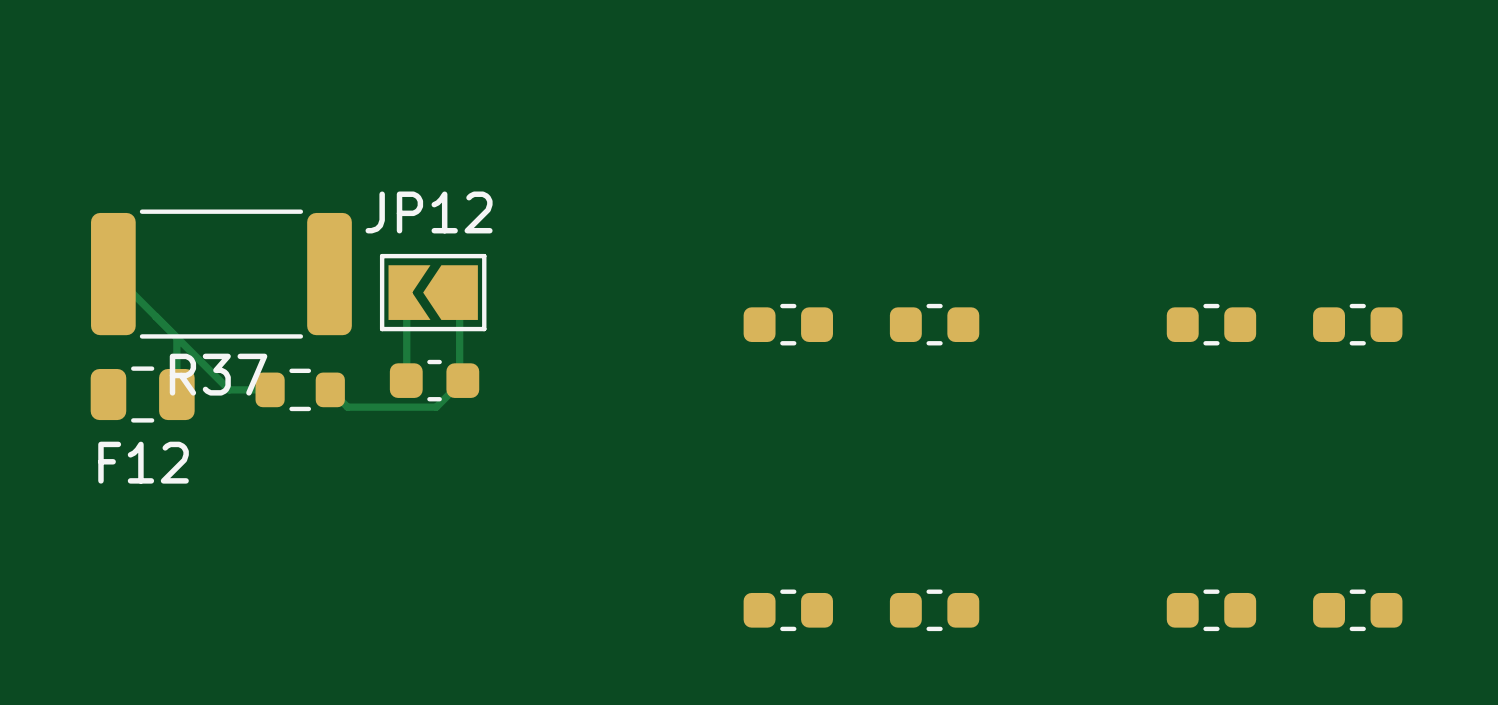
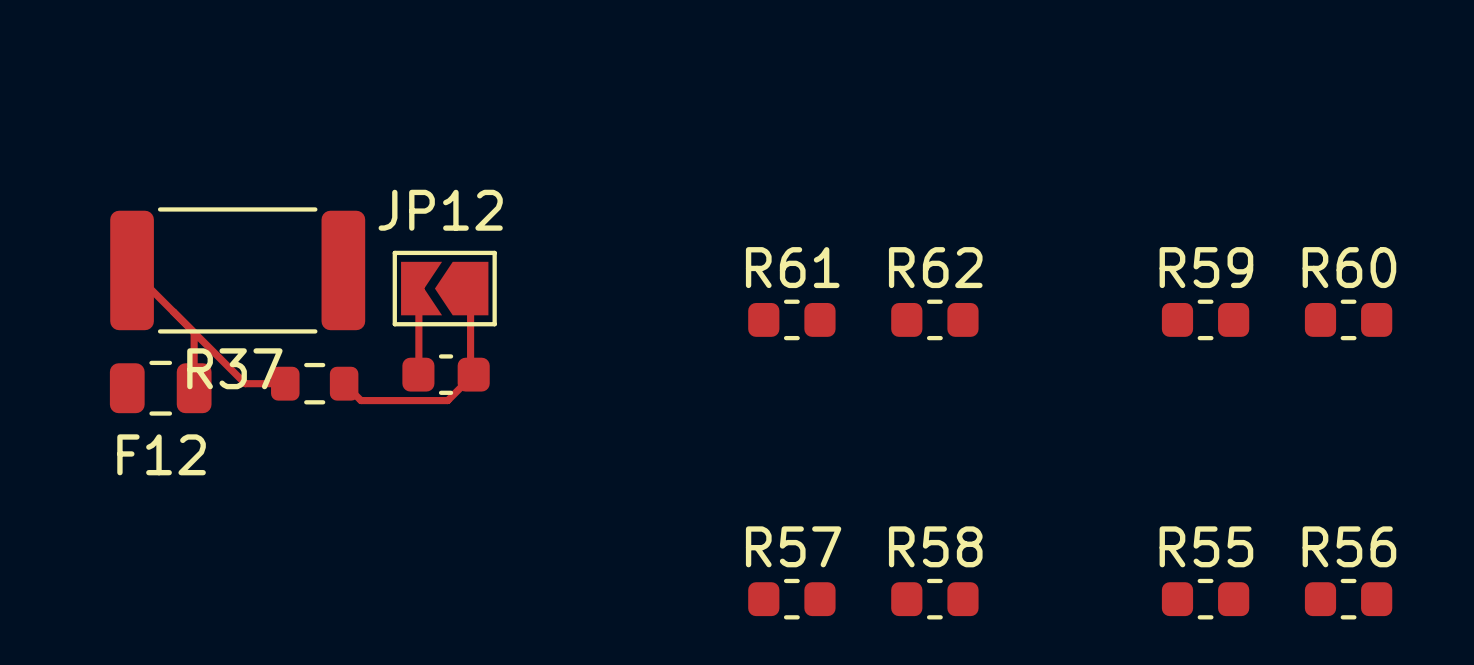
R61 name: none -> R61 (792, 267)
R62 name: none -> R62 (935, 267)
R59 name: none -> R59 (1206, 267)
R60 name: none -> R60 (1349, 267)
R57 name: none -> R57 (793, 546)
R58 name: none -> R58 (935, 546)
R55 name: none -> R55 (1206, 546)
R56 name: none -> R56 (1349, 546)

